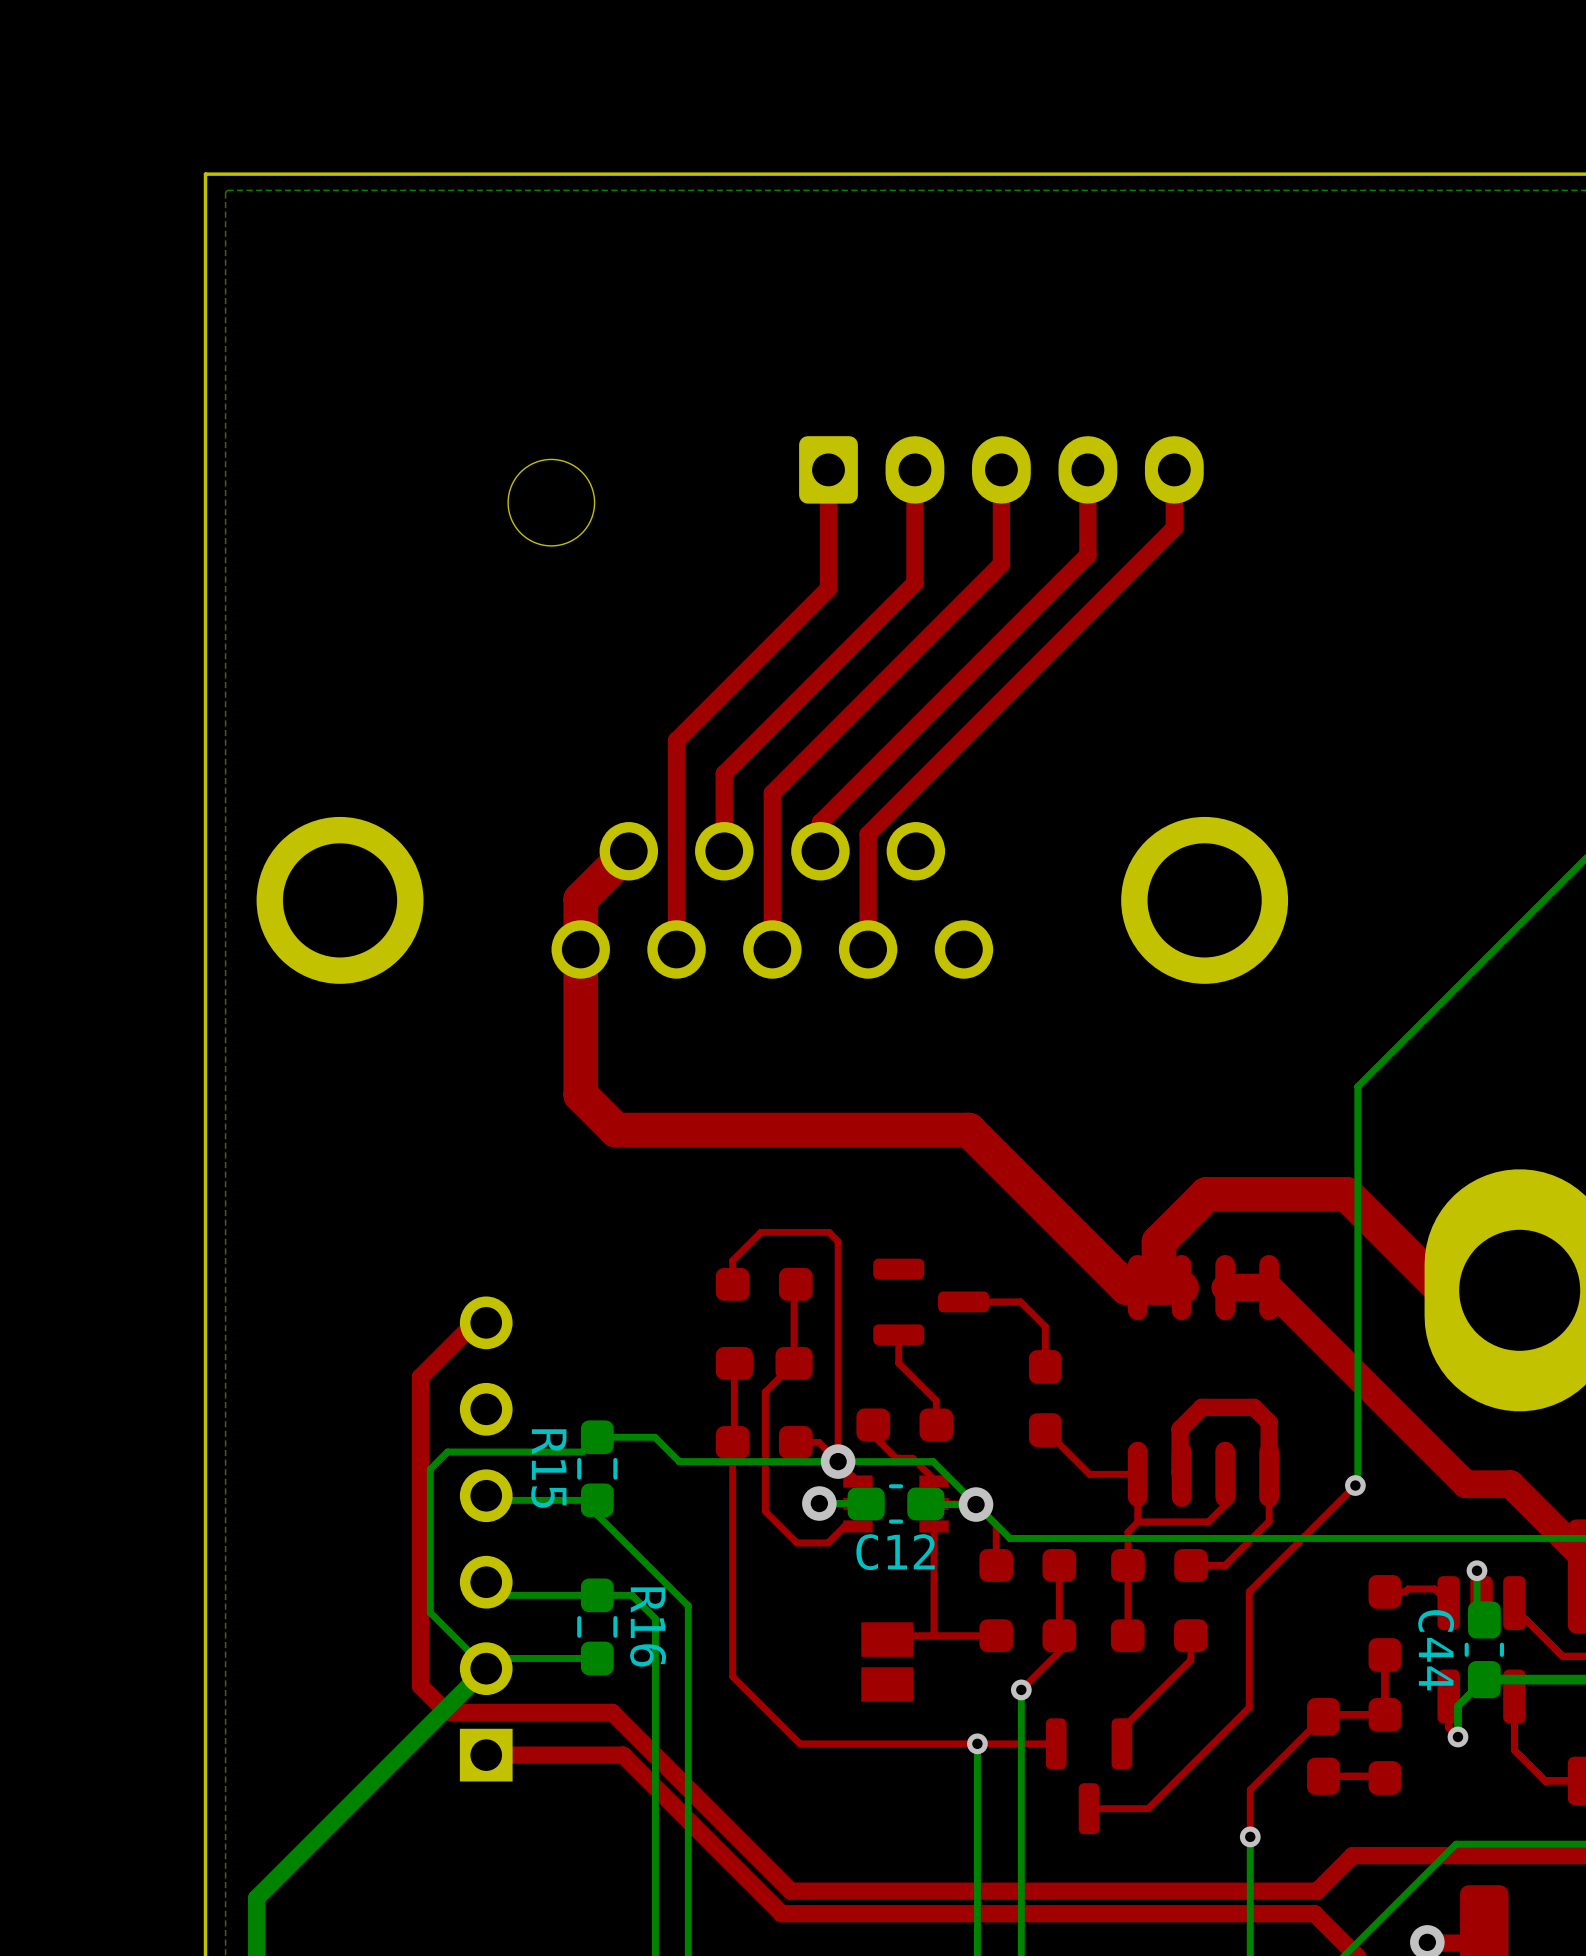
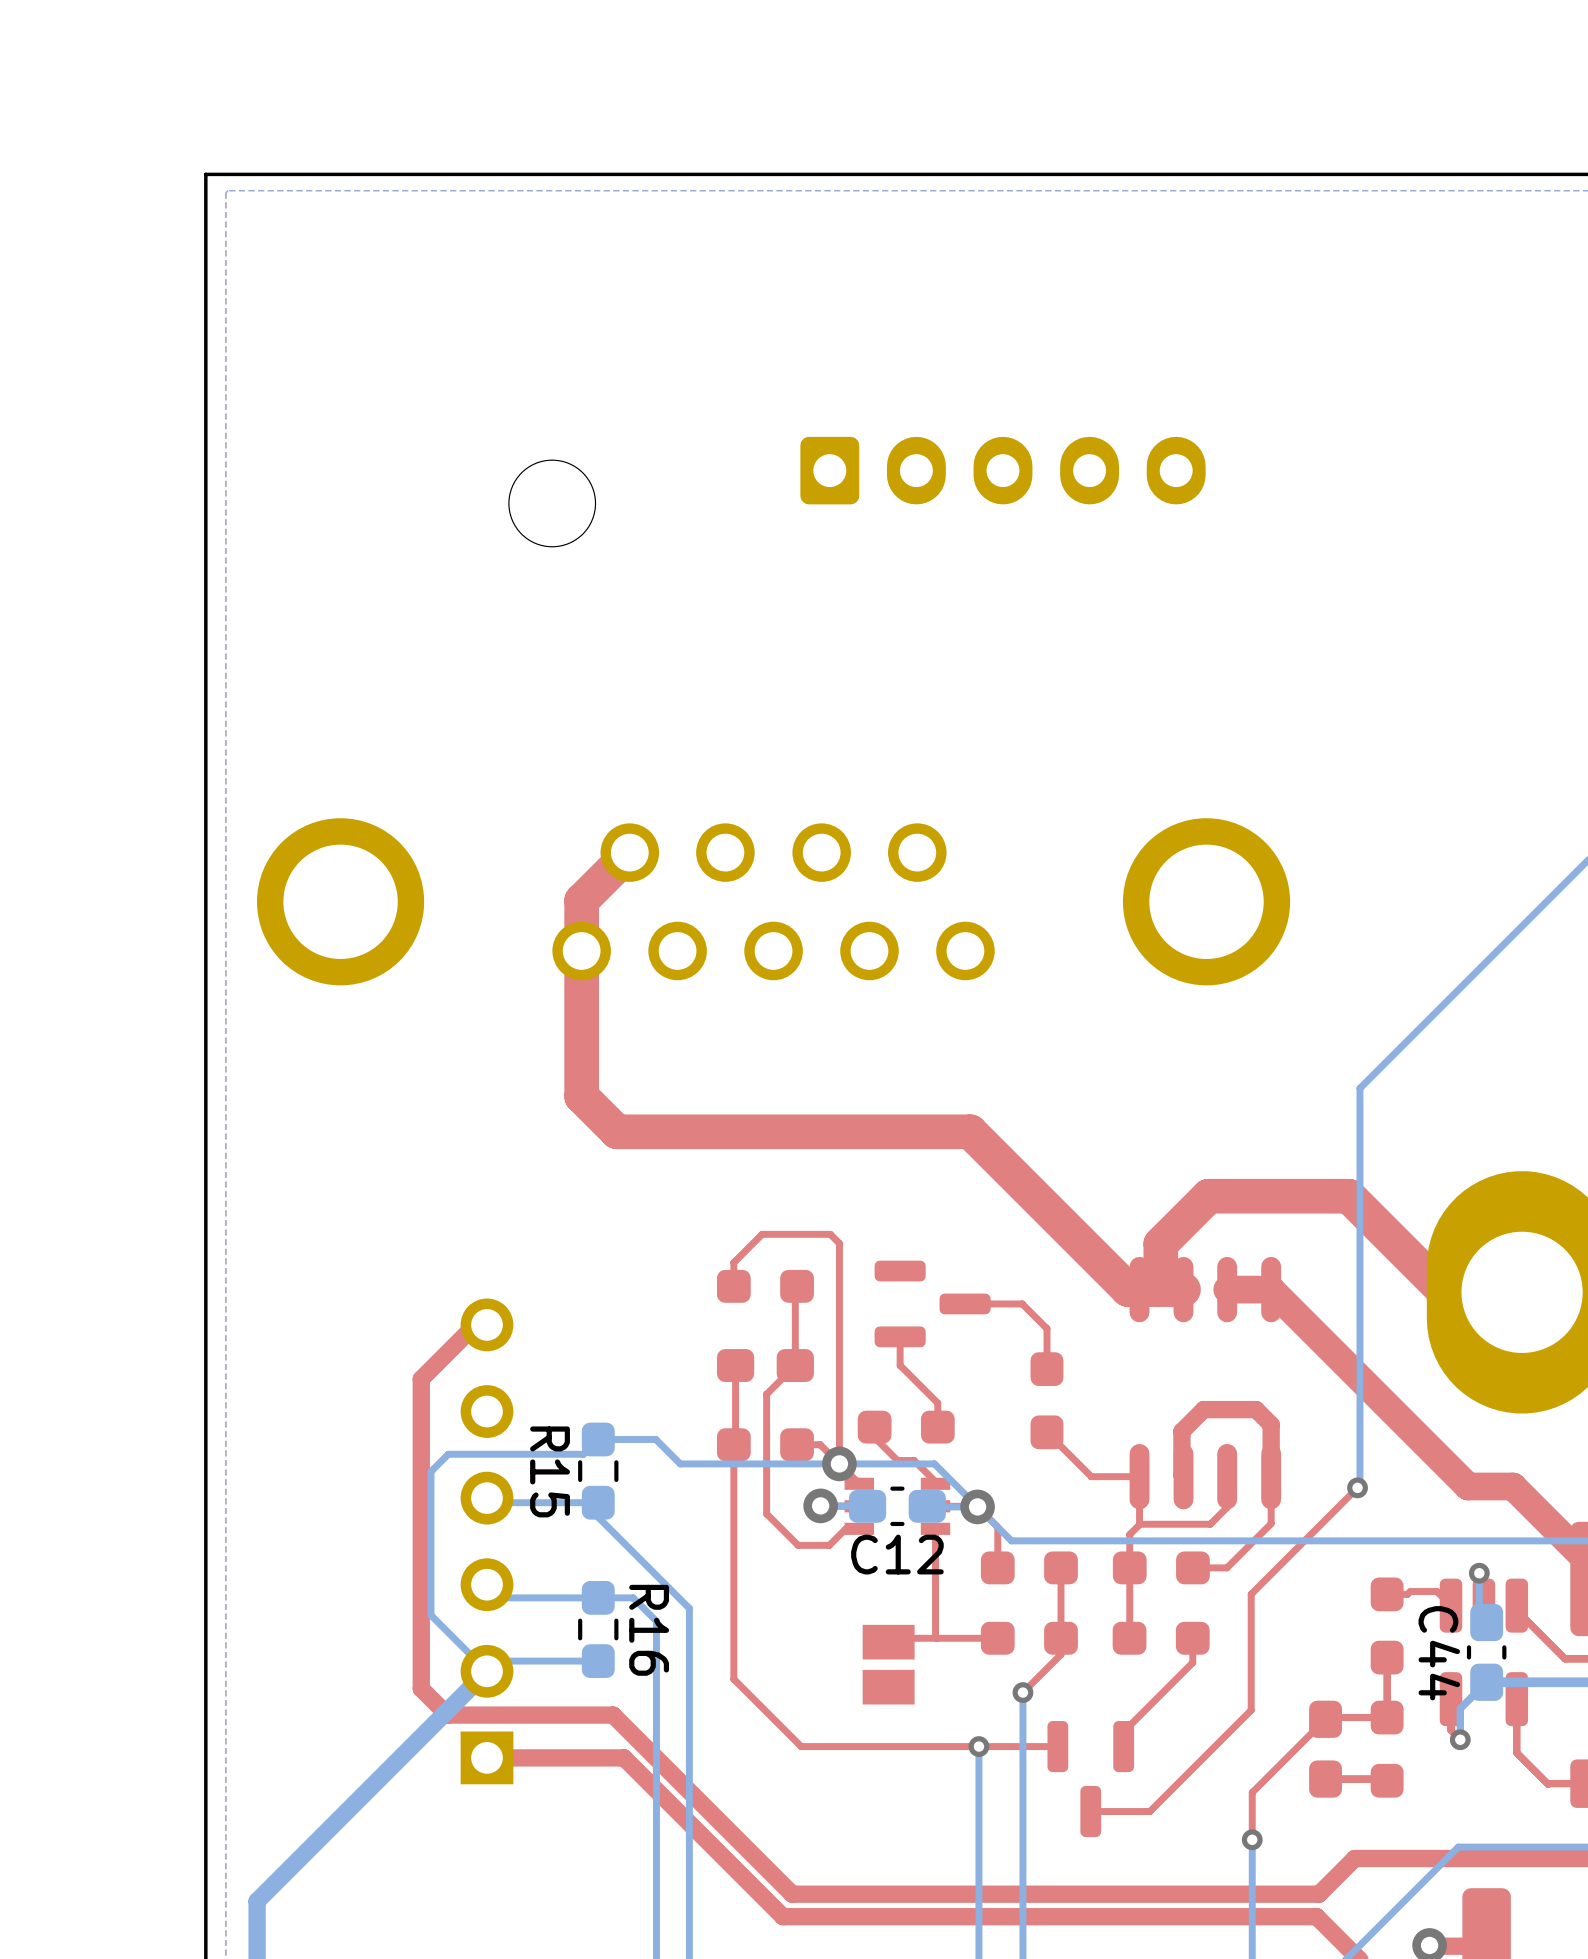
top track: (828, 469) (828, 588) (676, 740) (676, 949) -> none
top track: (914, 469) (914, 583) (724, 773) (724, 851) -> none
top track: (1001, 469) (1001, 564) (772, 793) (772, 949) -> none
top track: (1087, 469) (1087, 555) (820, 822) (820, 851) -> none
top track: (1174, 469) (1174, 528) (868, 834) (868, 949) -> none

